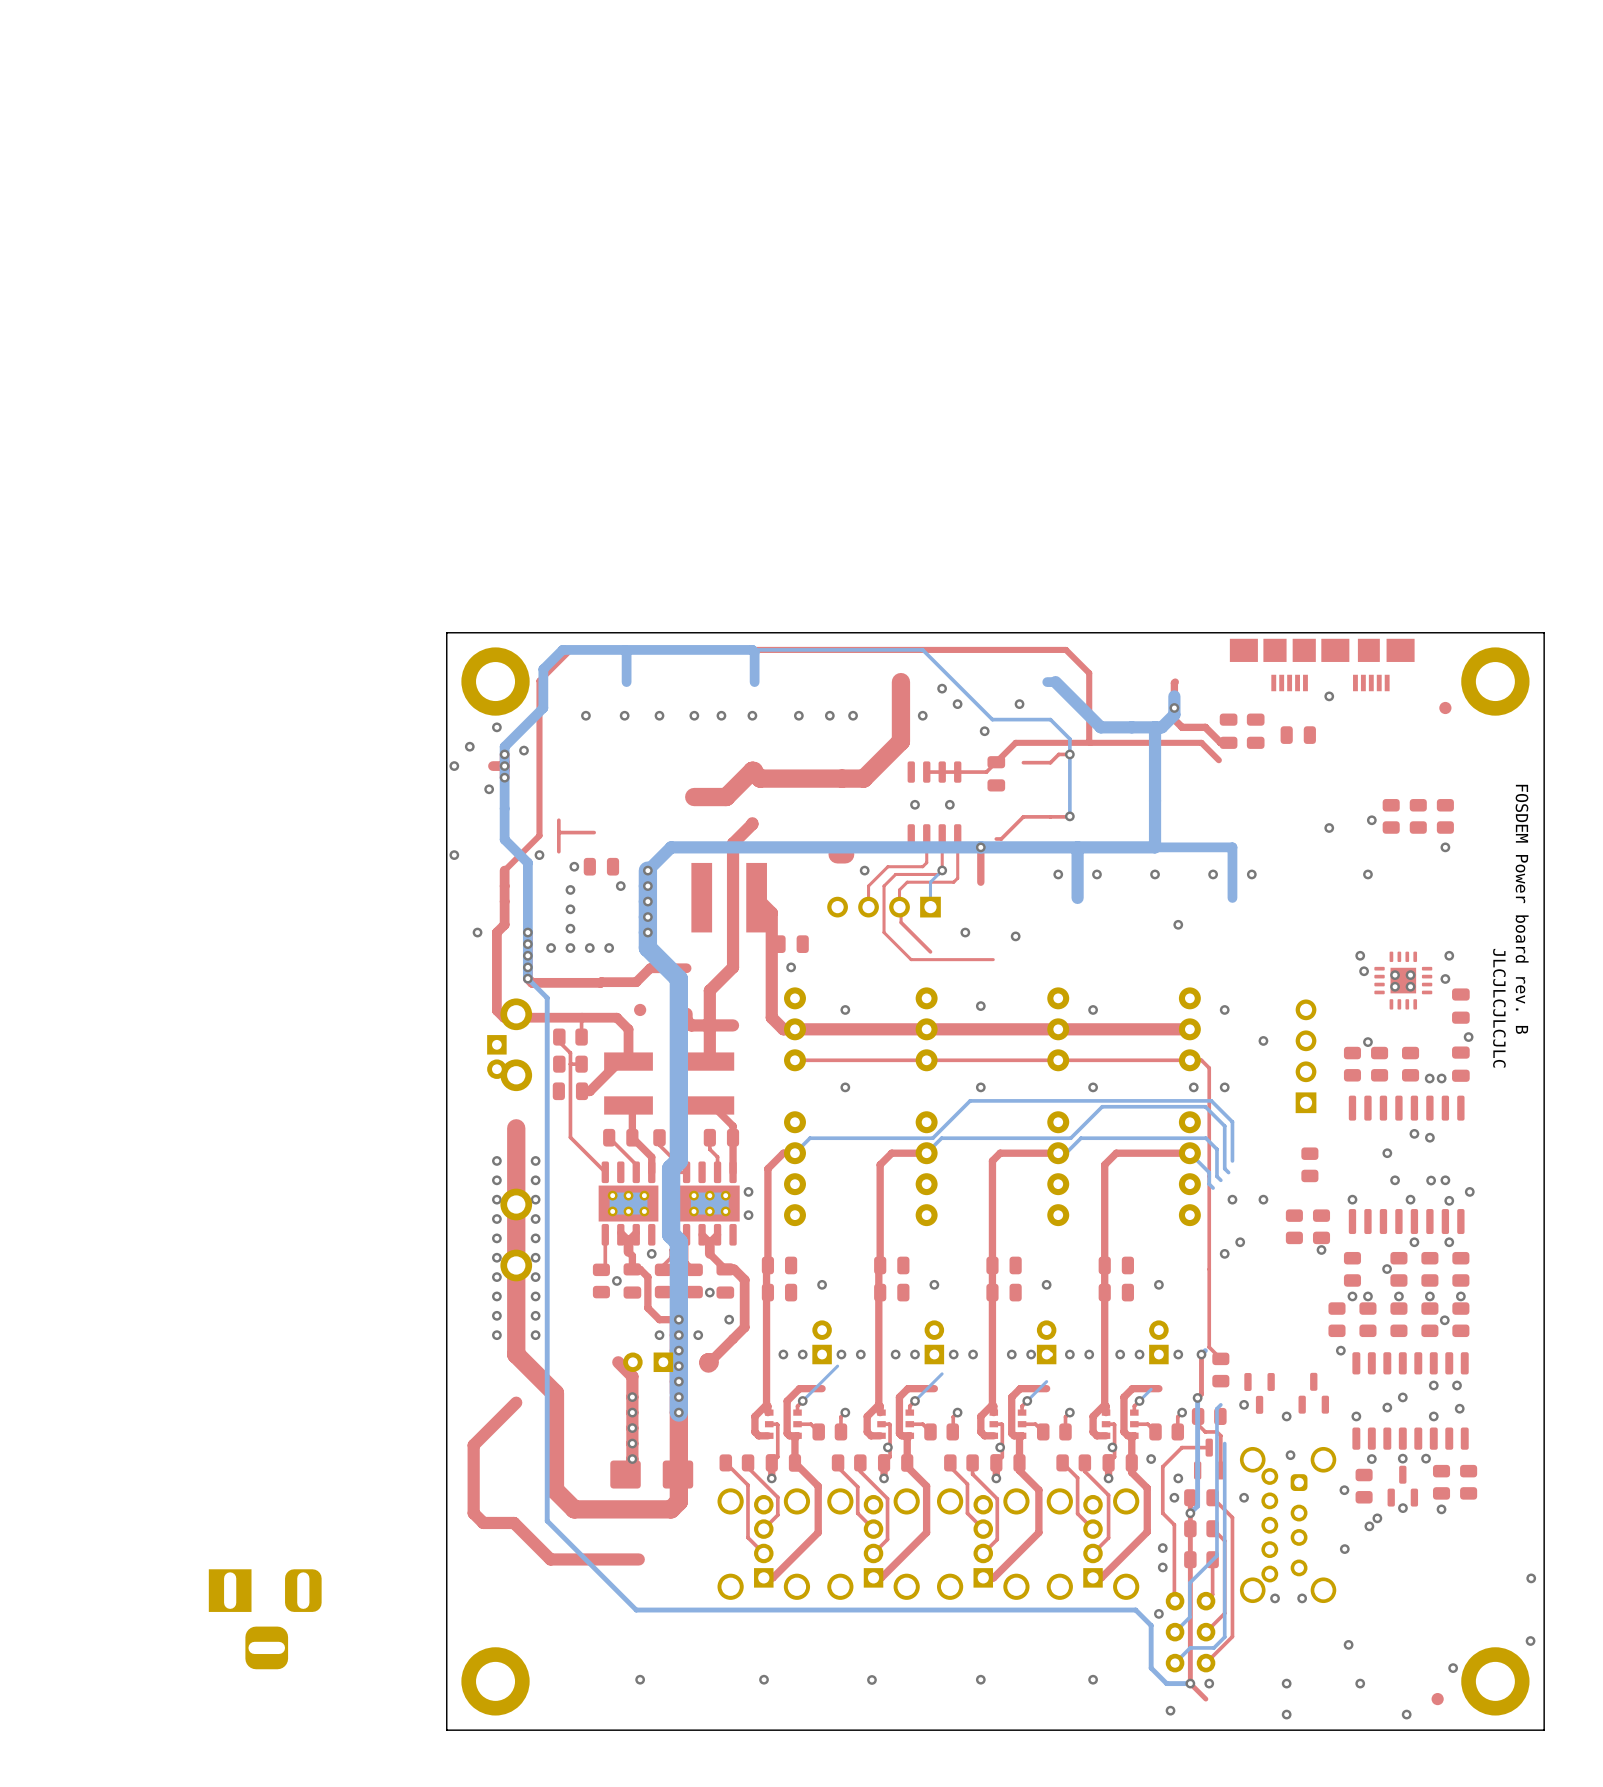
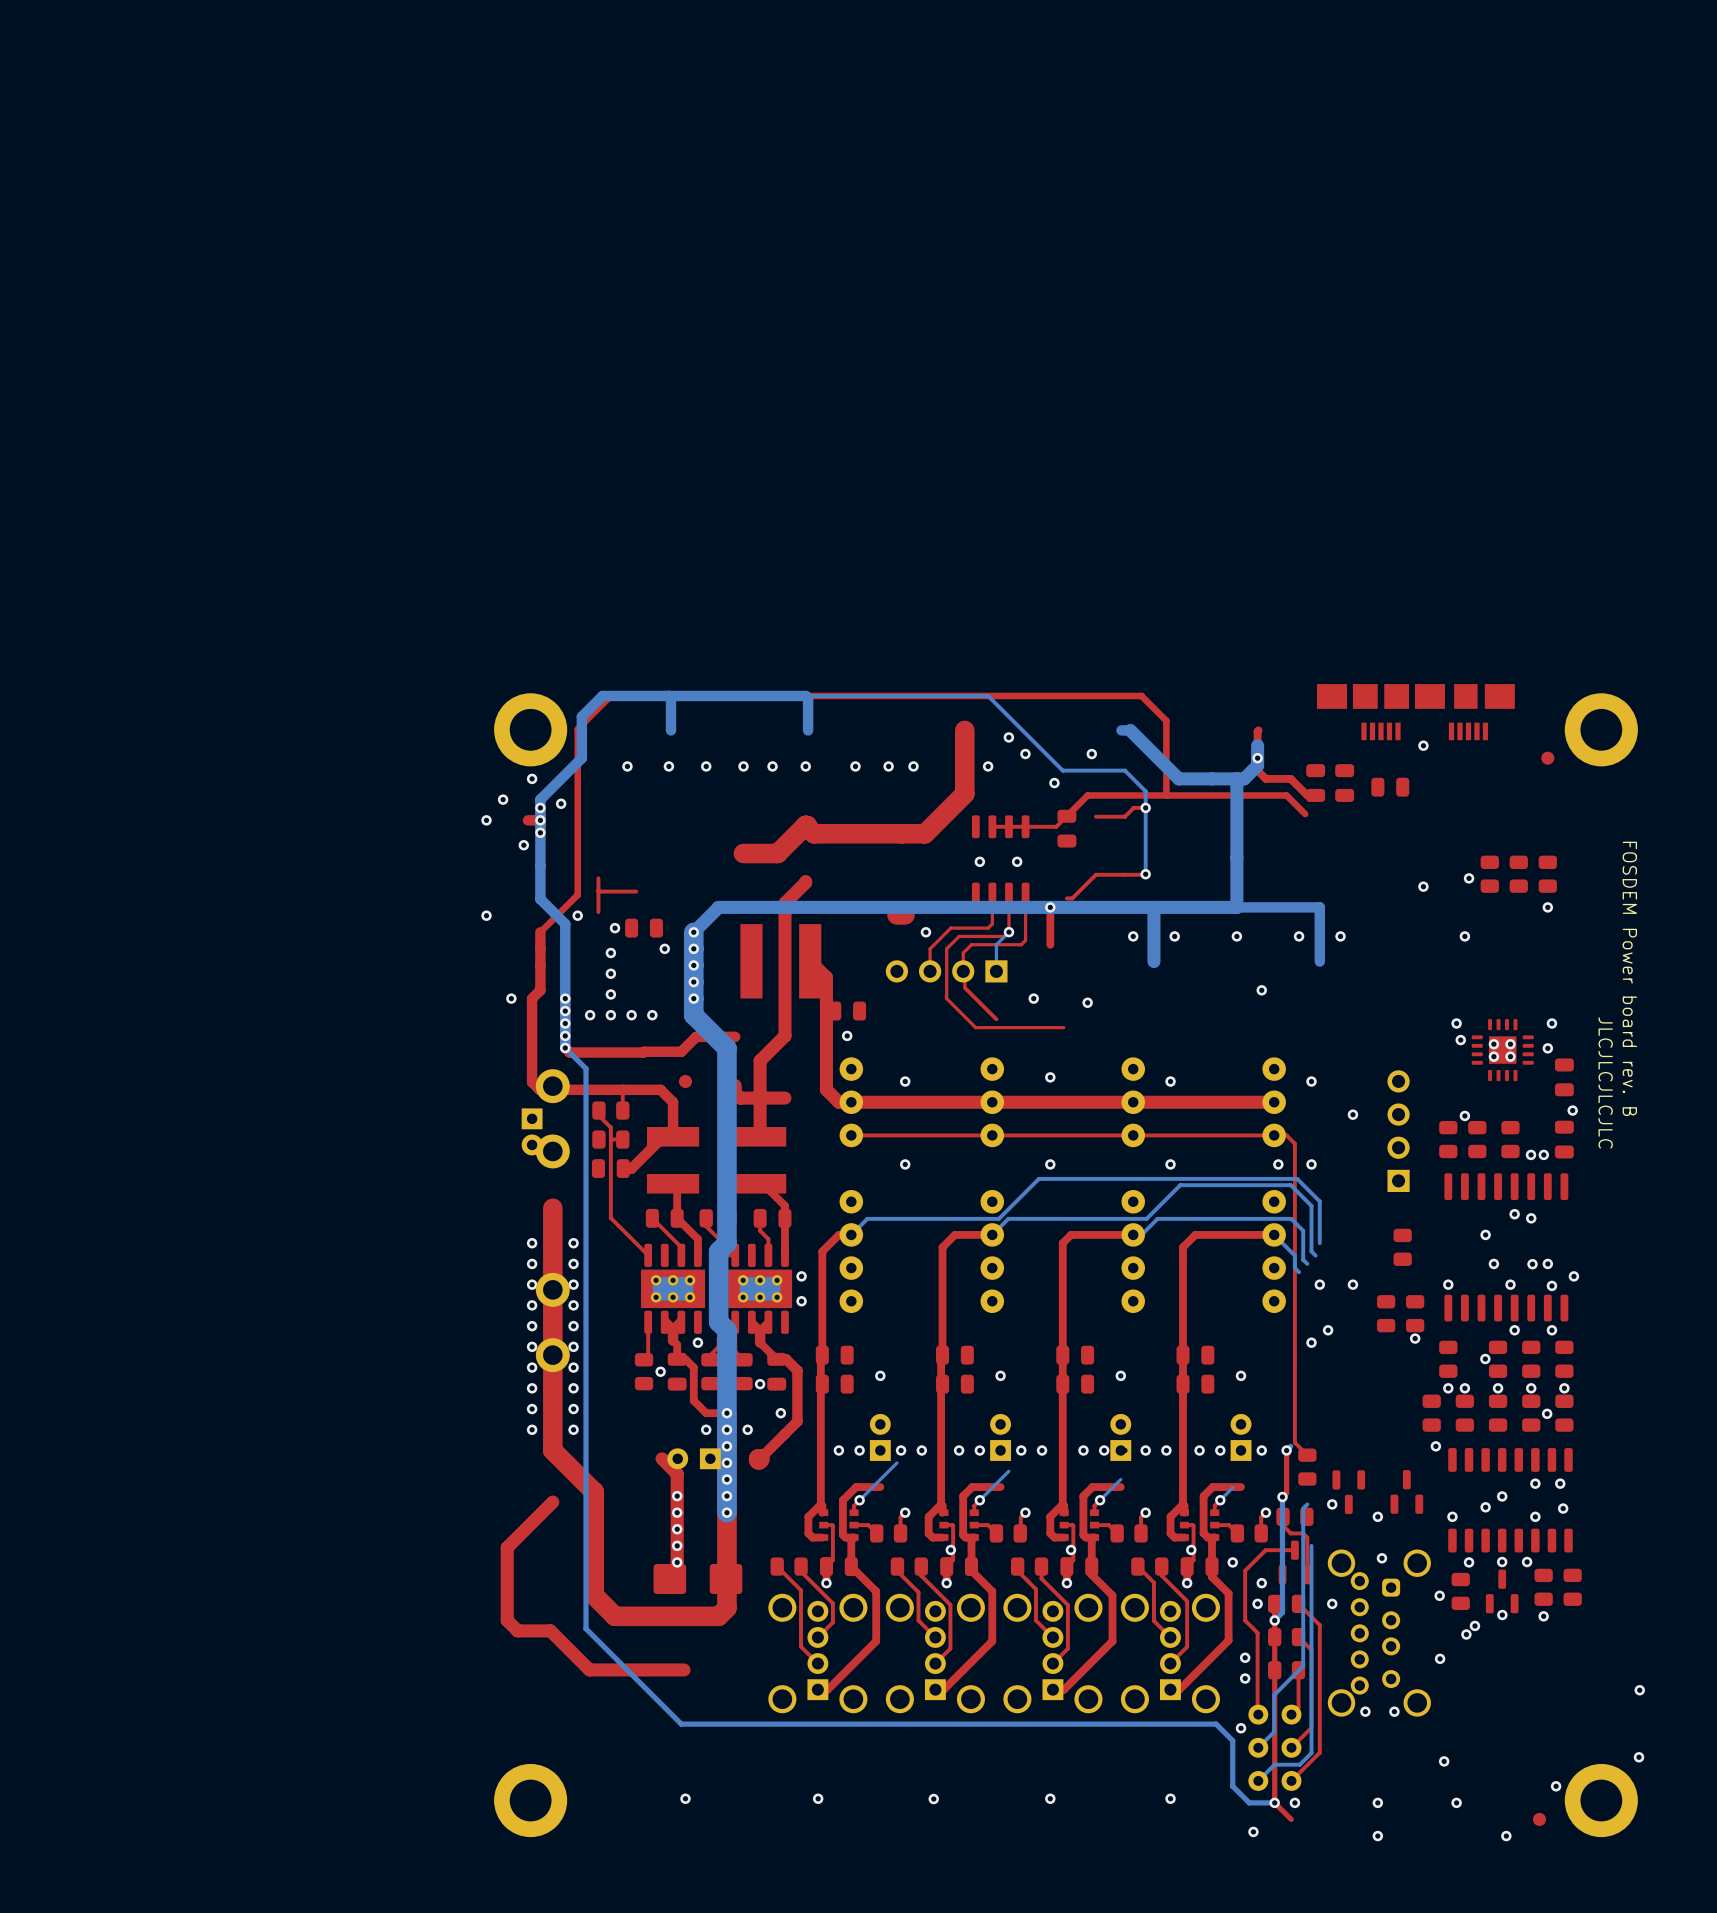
board edge: (1544, 632) (446, 632) (446, 1730) (1544, 1730) (1544, 632) -> none
part: (265, 1619) -> none

